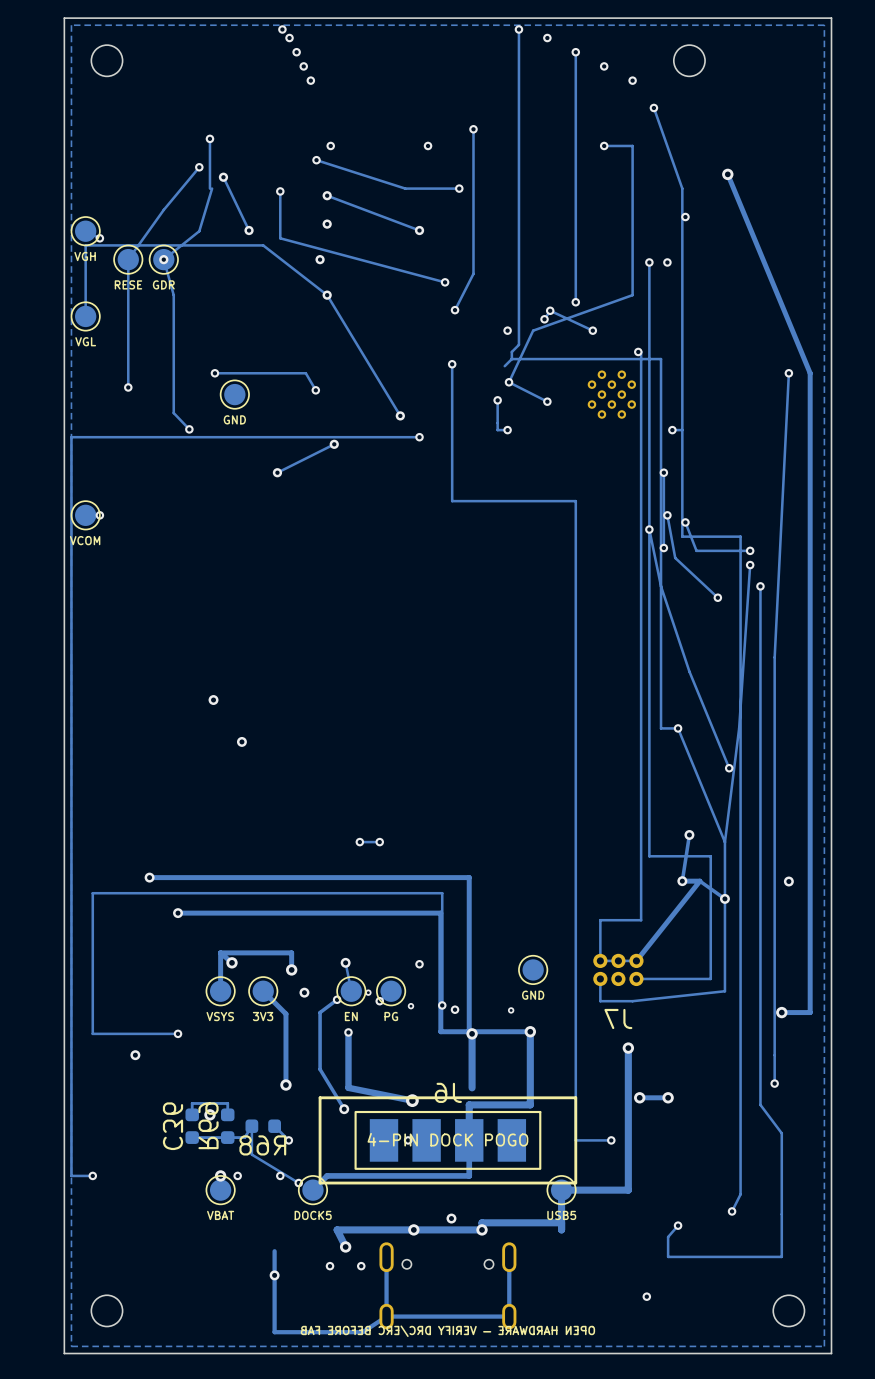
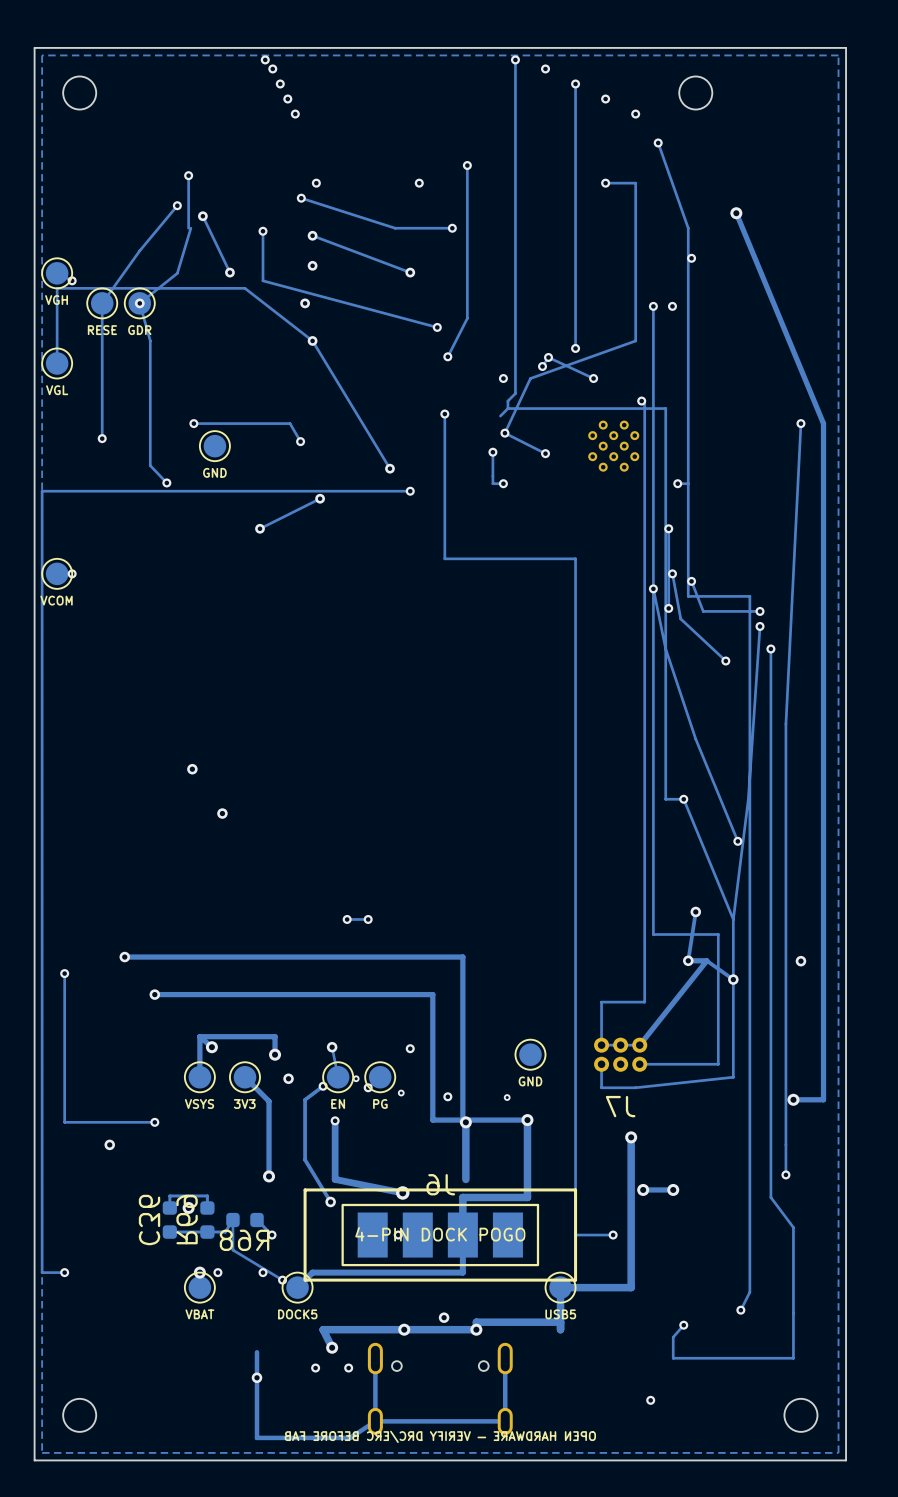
track: (92, 893) (442, 893) (442, 1005) -> none
via: none -> (64, 973)
via: (442, 1005) -> none

